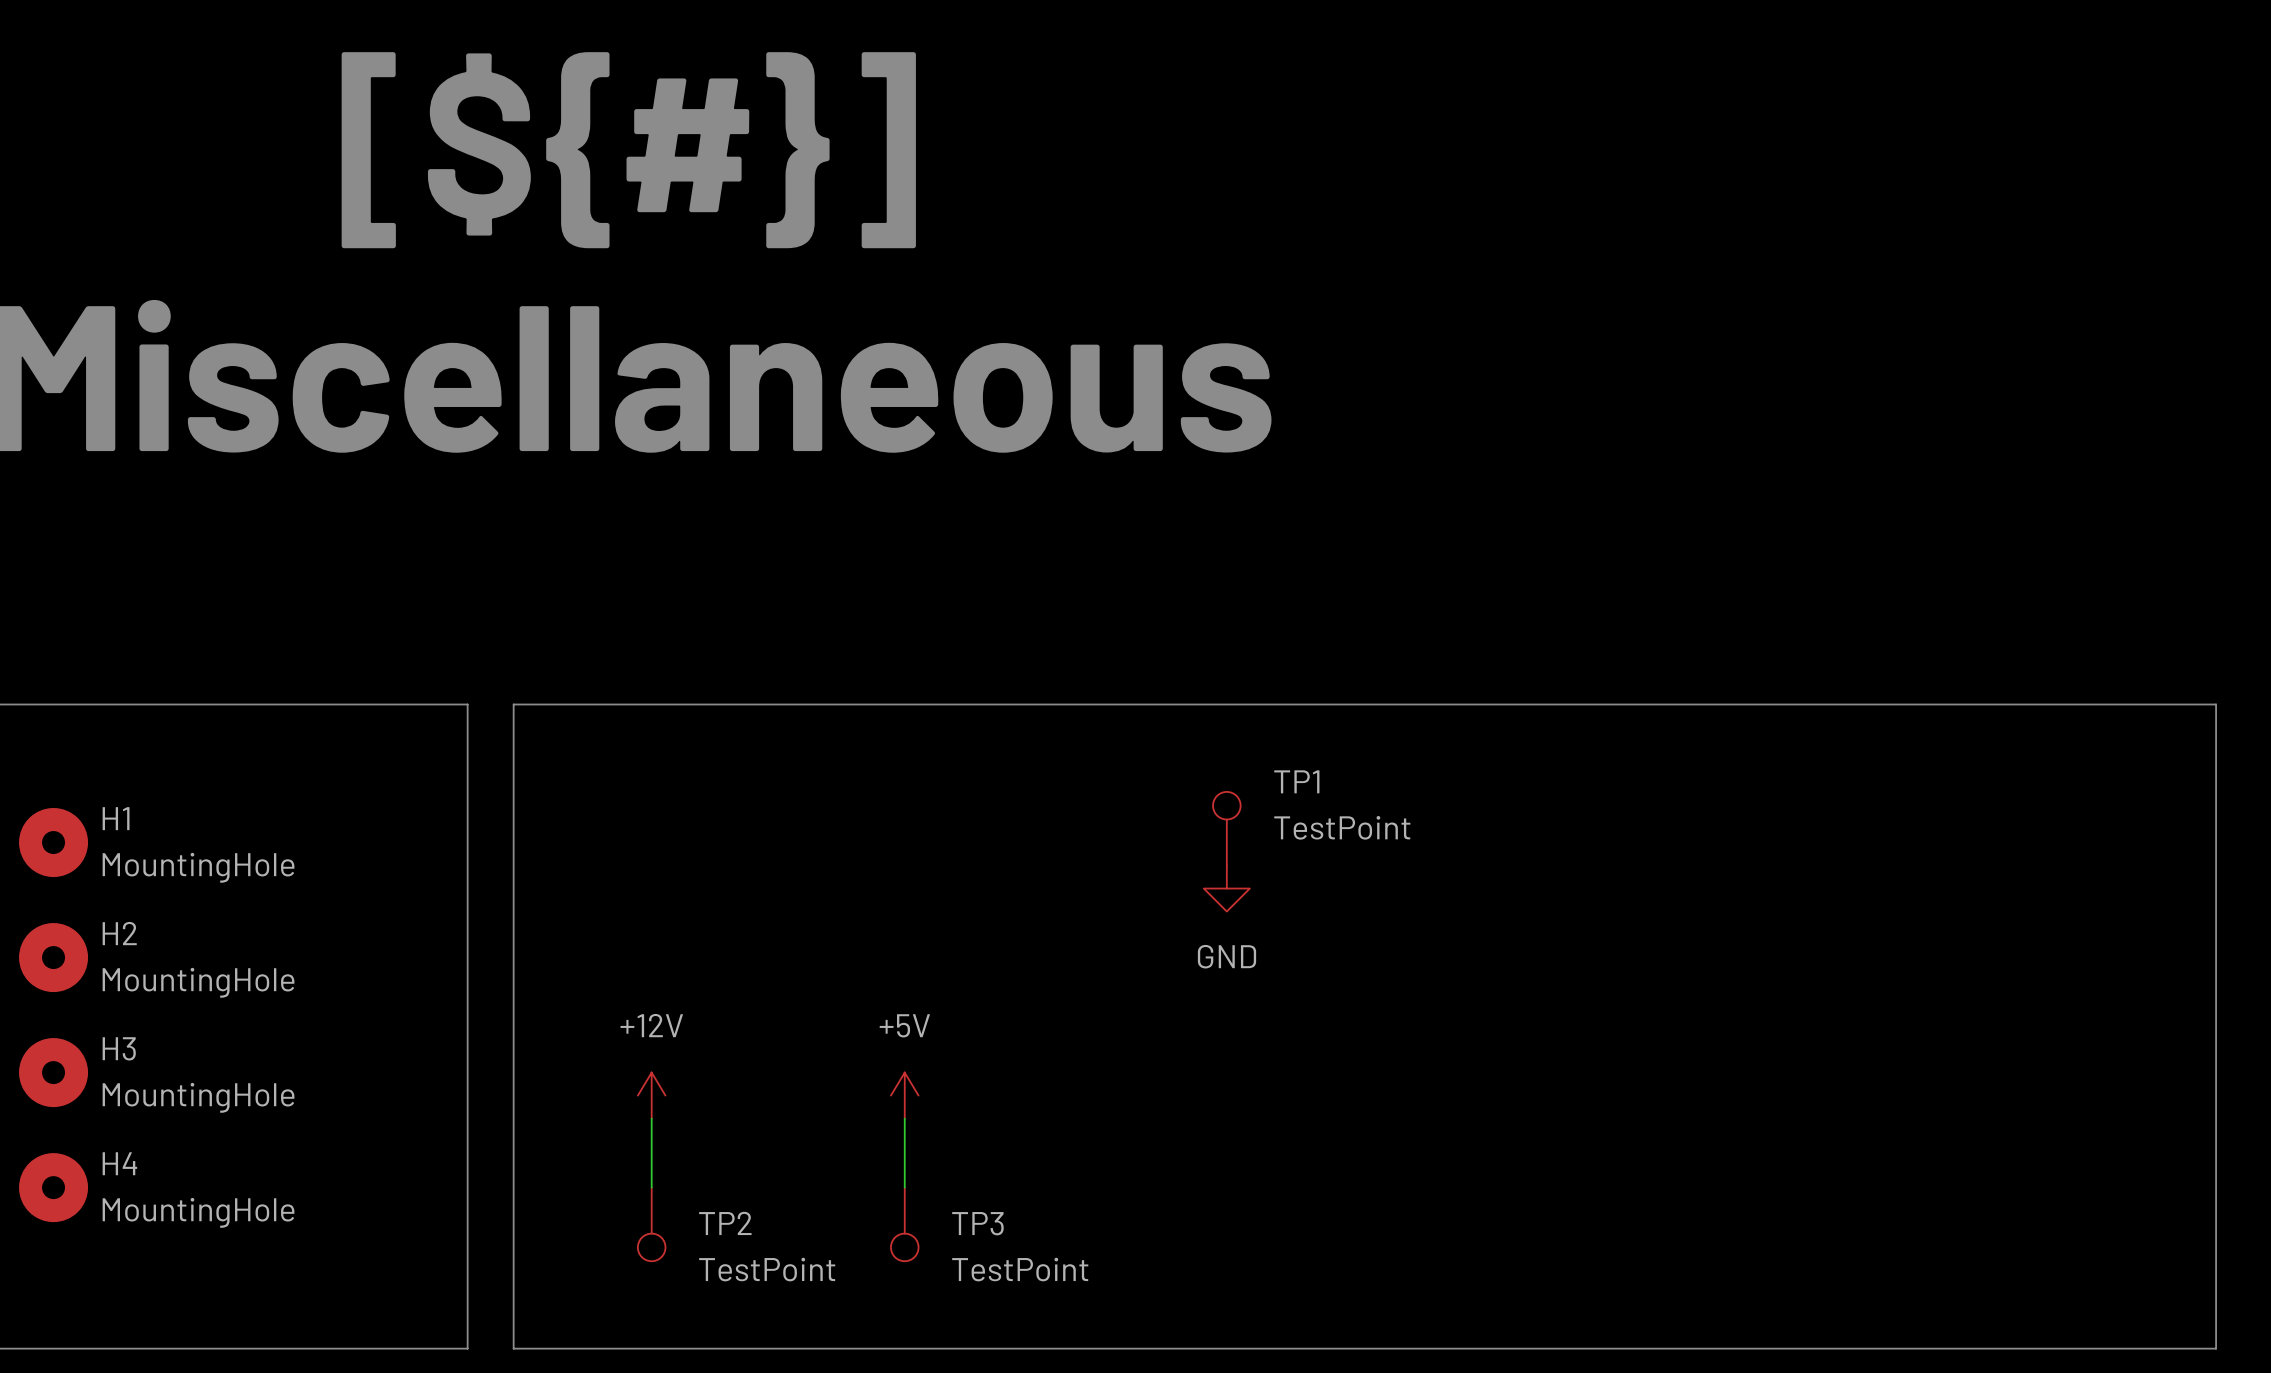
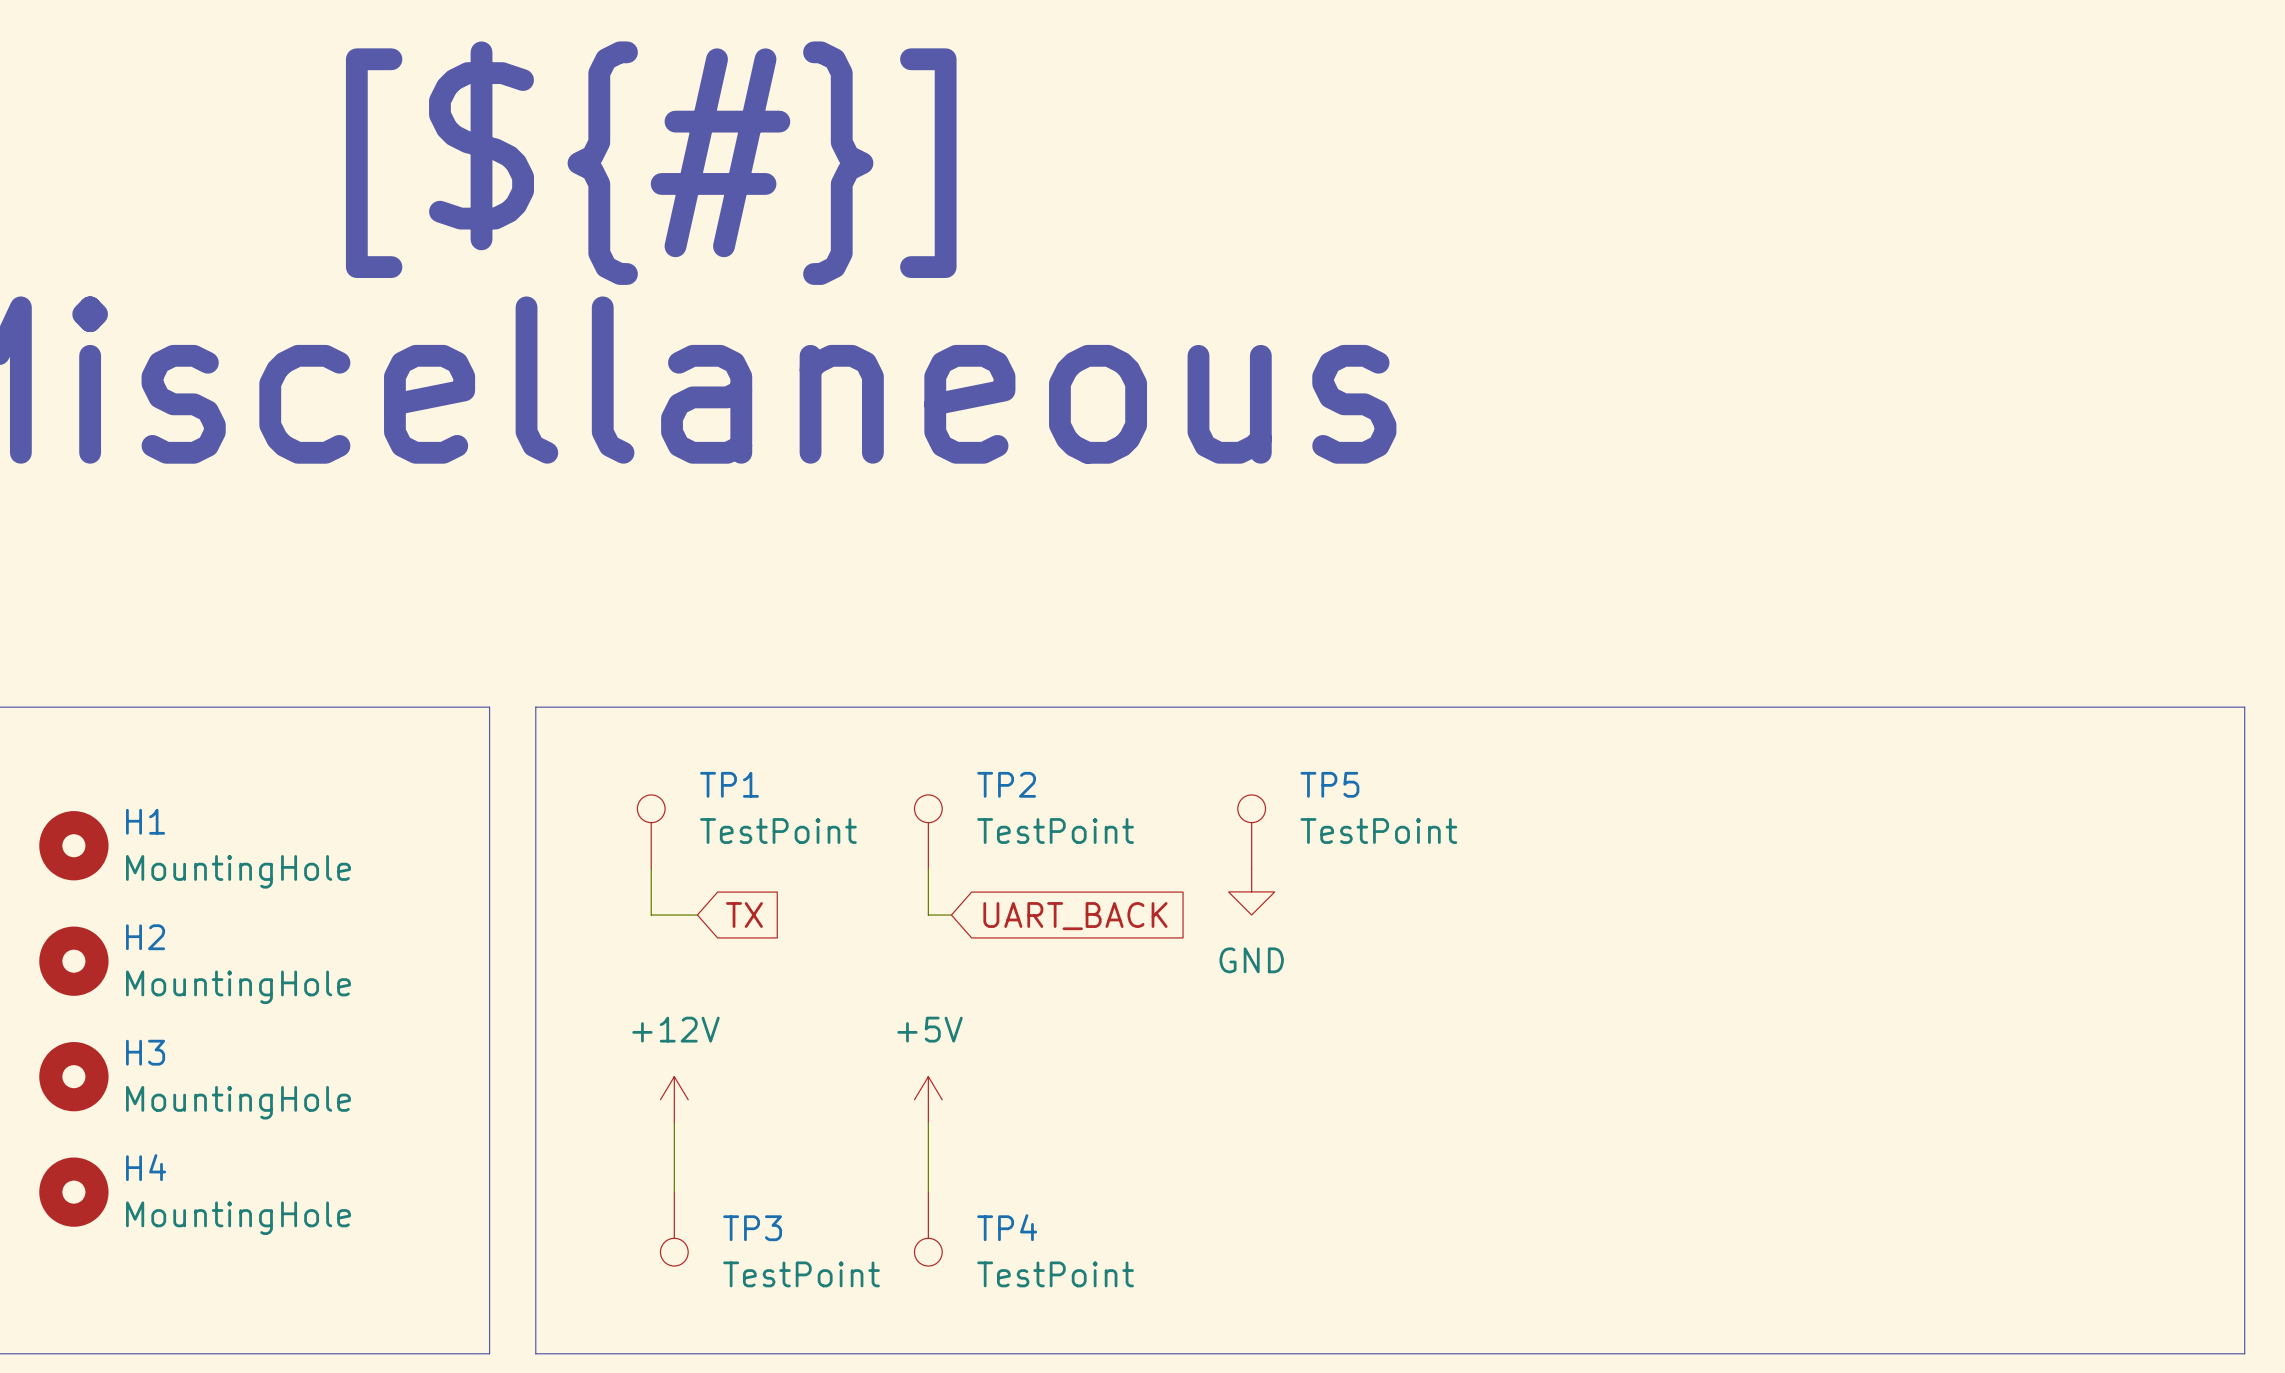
TP1 name: TP1 (1296, 781) -> TP5 (1329, 784)
TP1: none -> TestPoint (651, 831)
TP2: none -> TestPoint (928, 831)
wire: none -> (651, 868) (651, 915) (697, 915)
wire: none -> (928, 868) (928, 915) (951, 915)
global label: none -> TX (744, 915)
global label: none -> UART_BACK (1075, 916)
TP2 name: TP2 (725, 1223) -> TP3 (752, 1228)
TP3 name: TP3 (977, 1223) -> TP4 (1007, 1227)

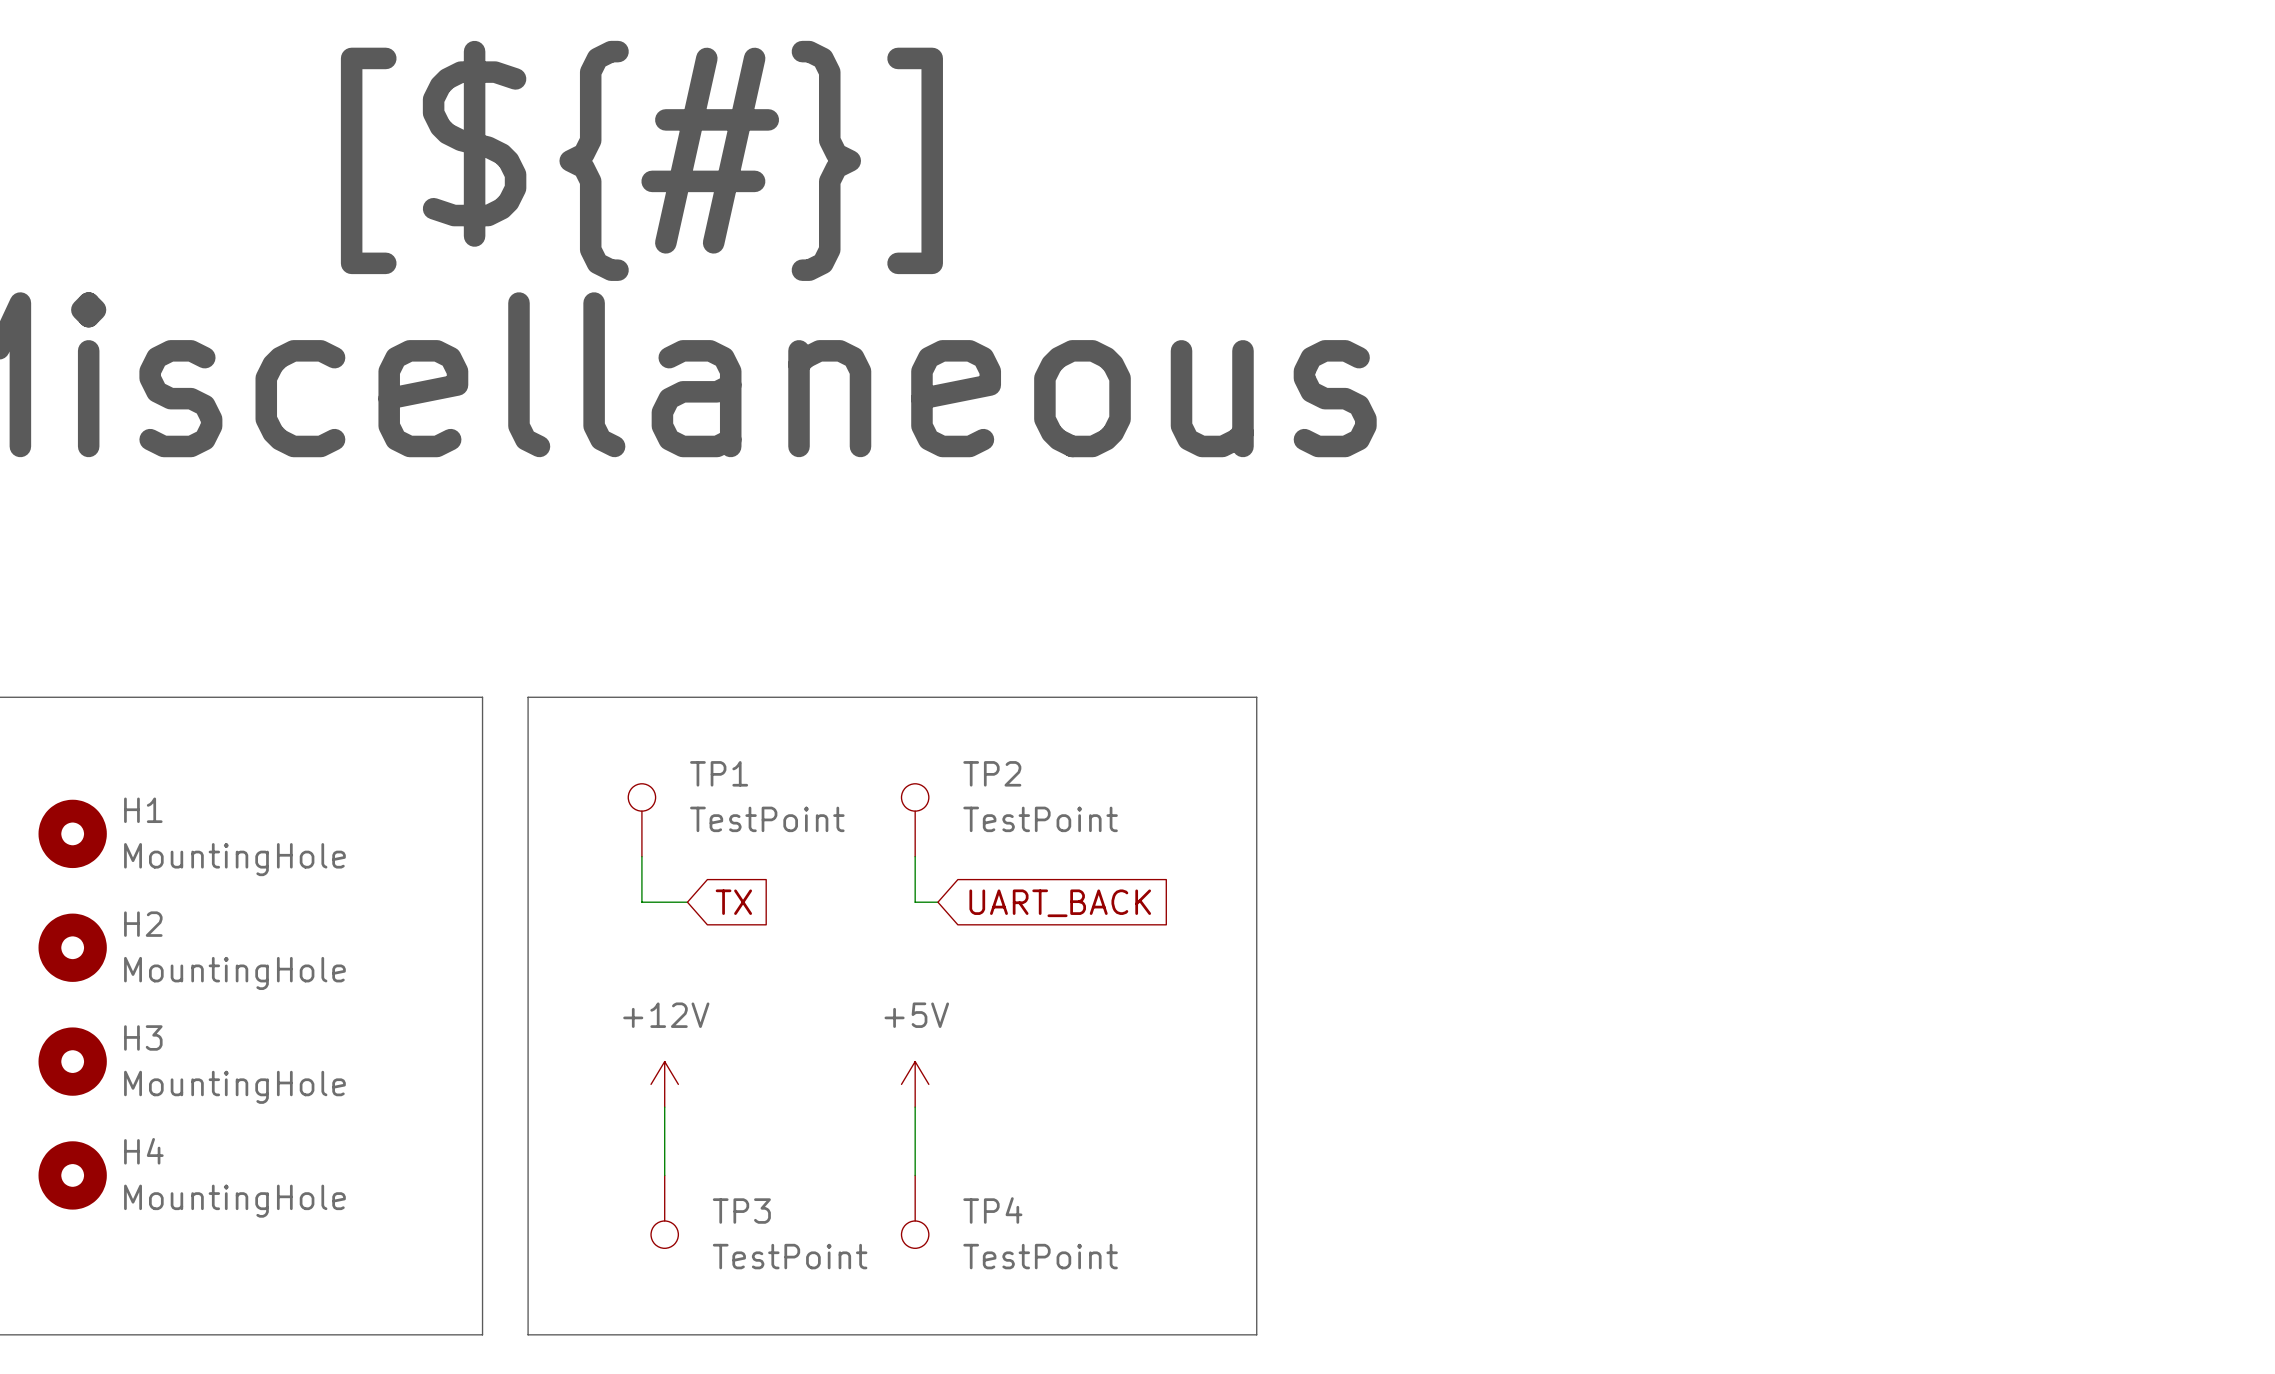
line: (1274, 707) (2244, 707) (2244, 1353) (1274, 1353) -> (1256, 697) (1256, 1334)
TP5: TestPoint (1251, 831) -> none
power symbol: GND (1251, 891) -> none

